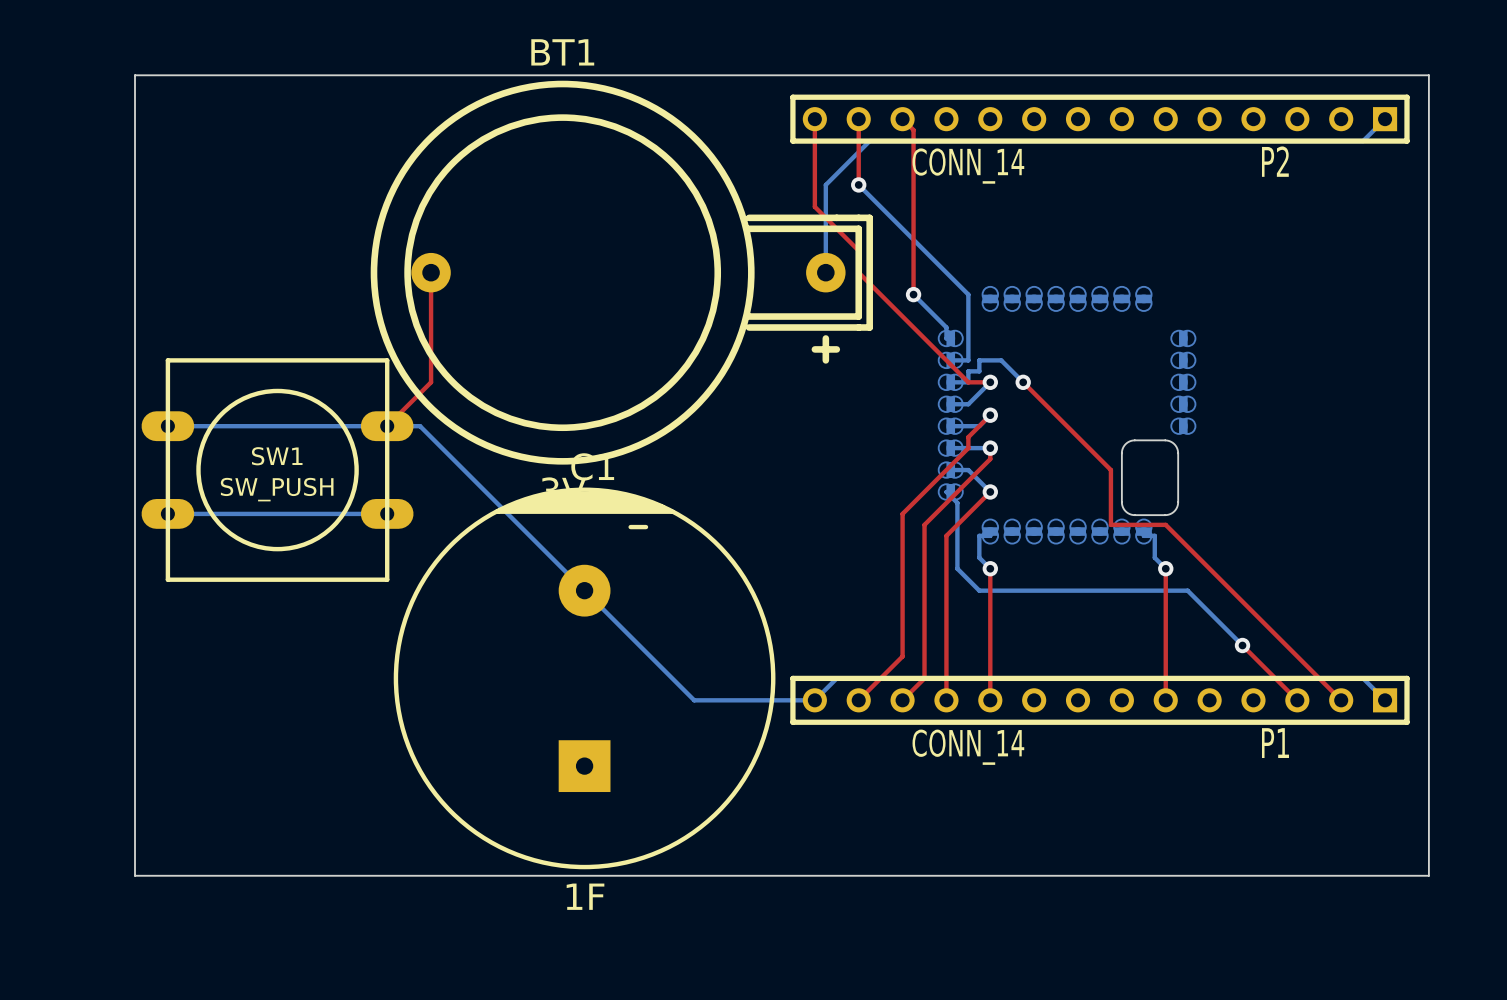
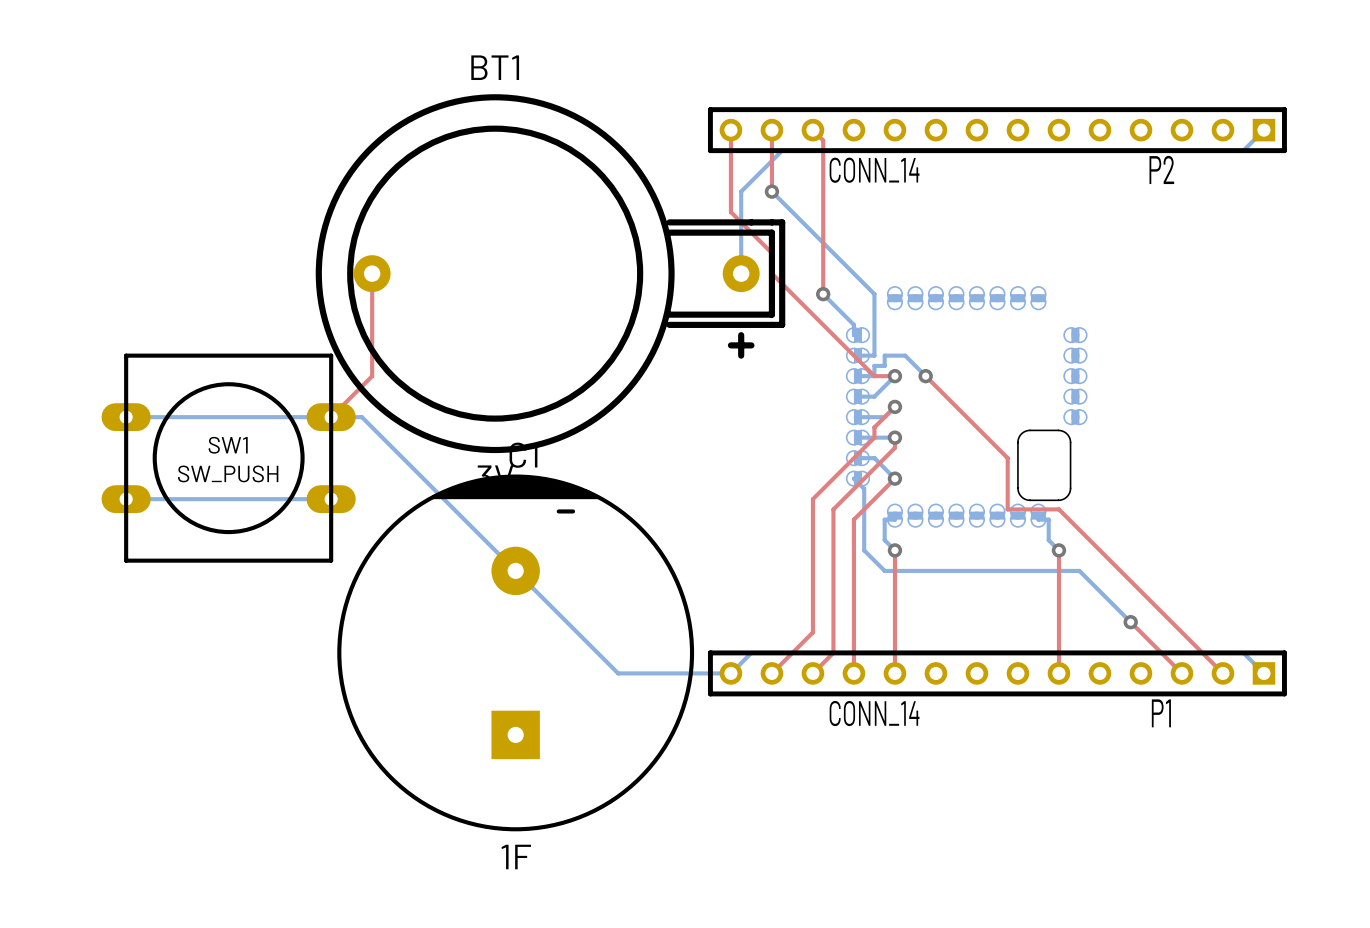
board edge: (135, 75) (1428, 75) (1428, 875) (135, 875) (135, 75) -> none

